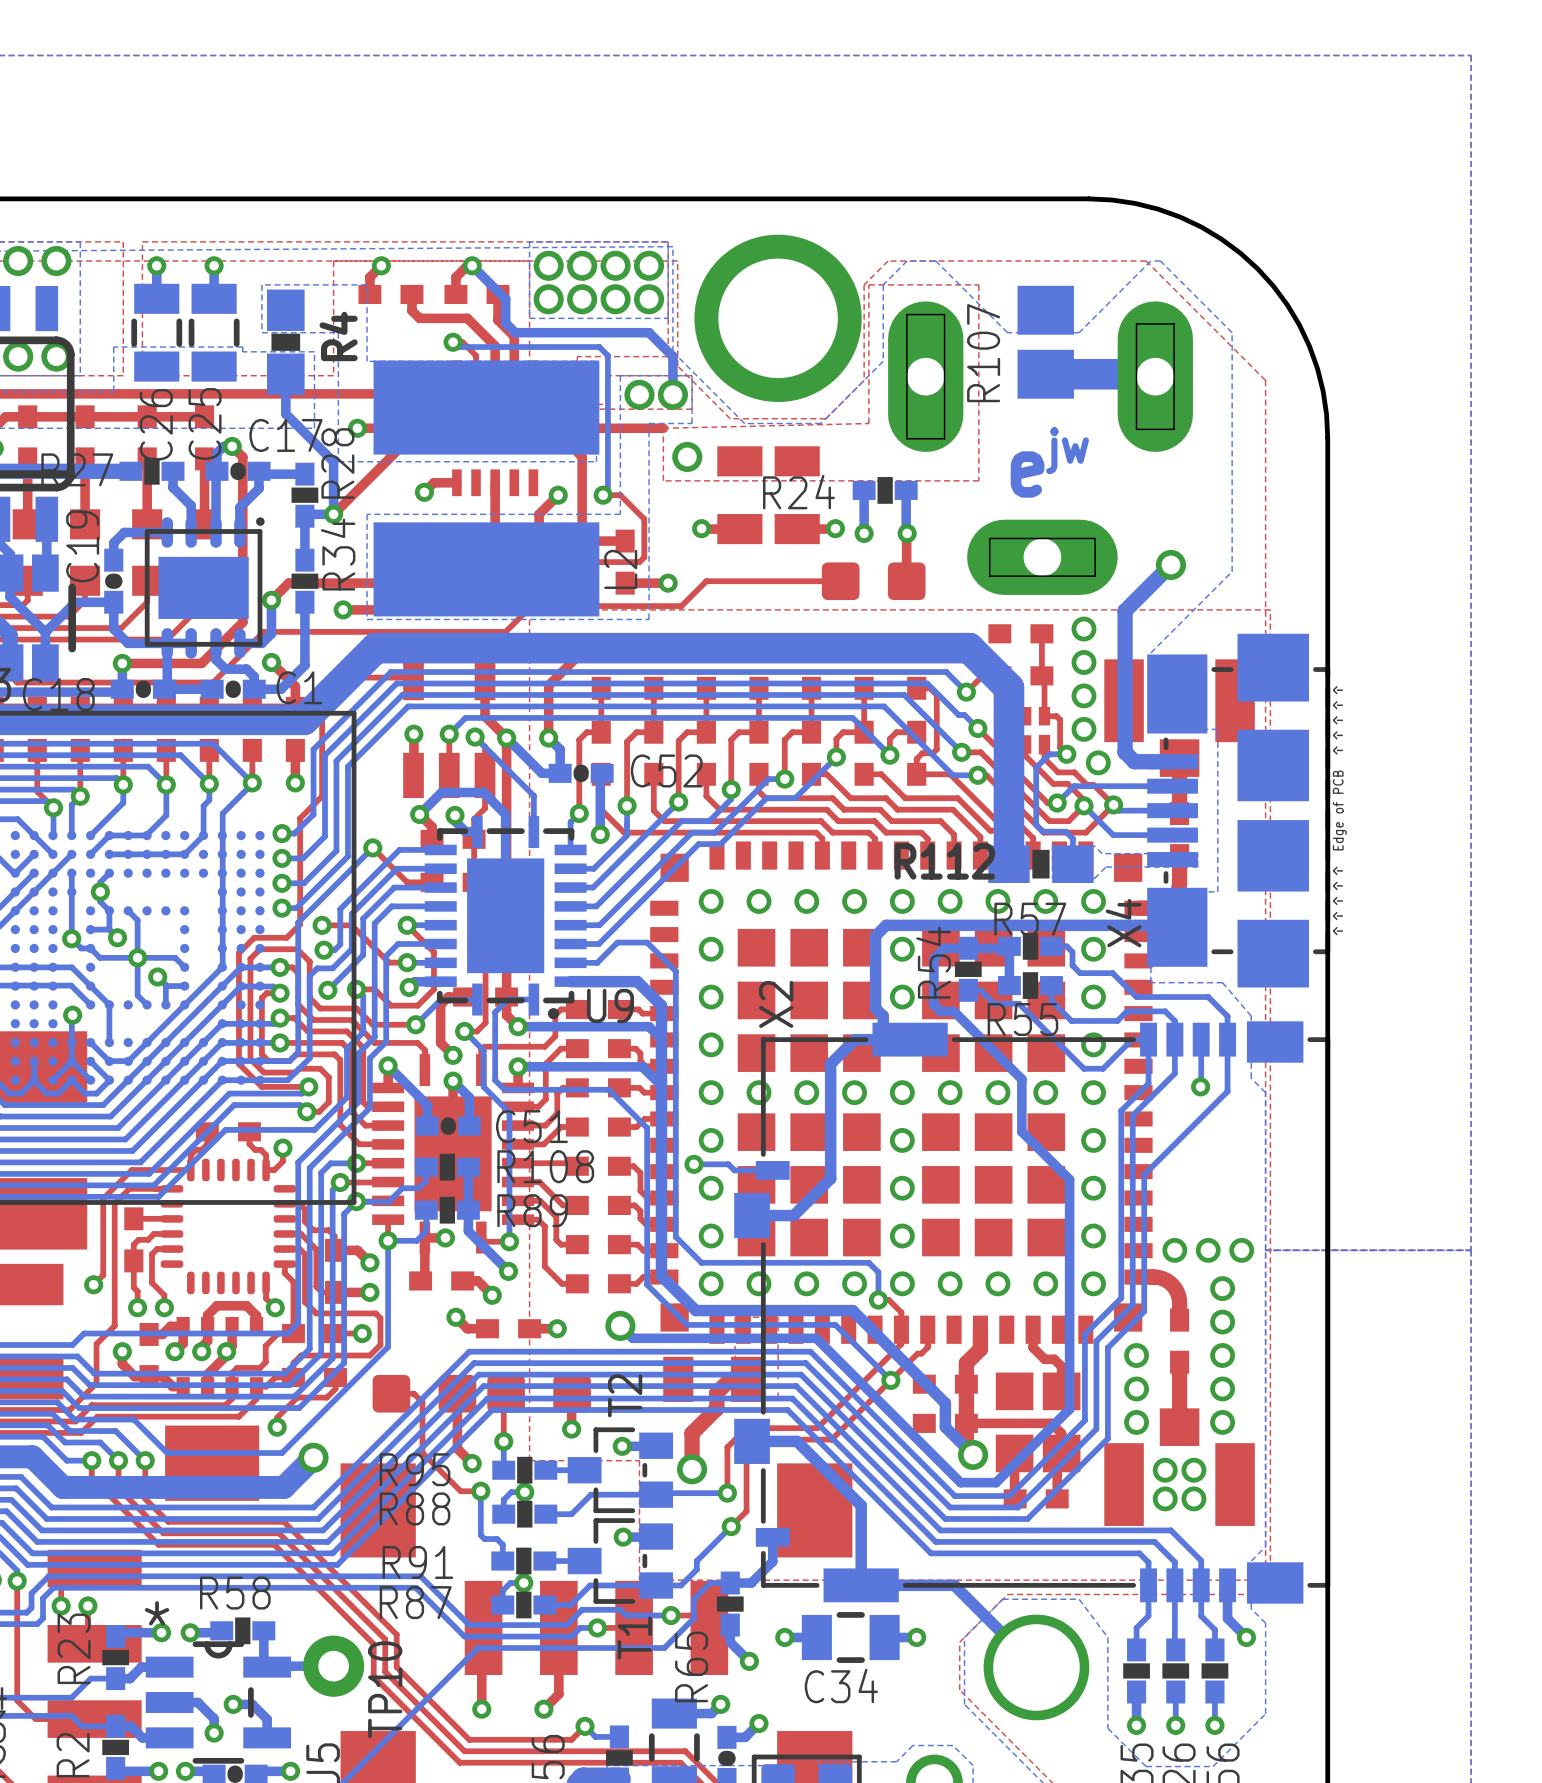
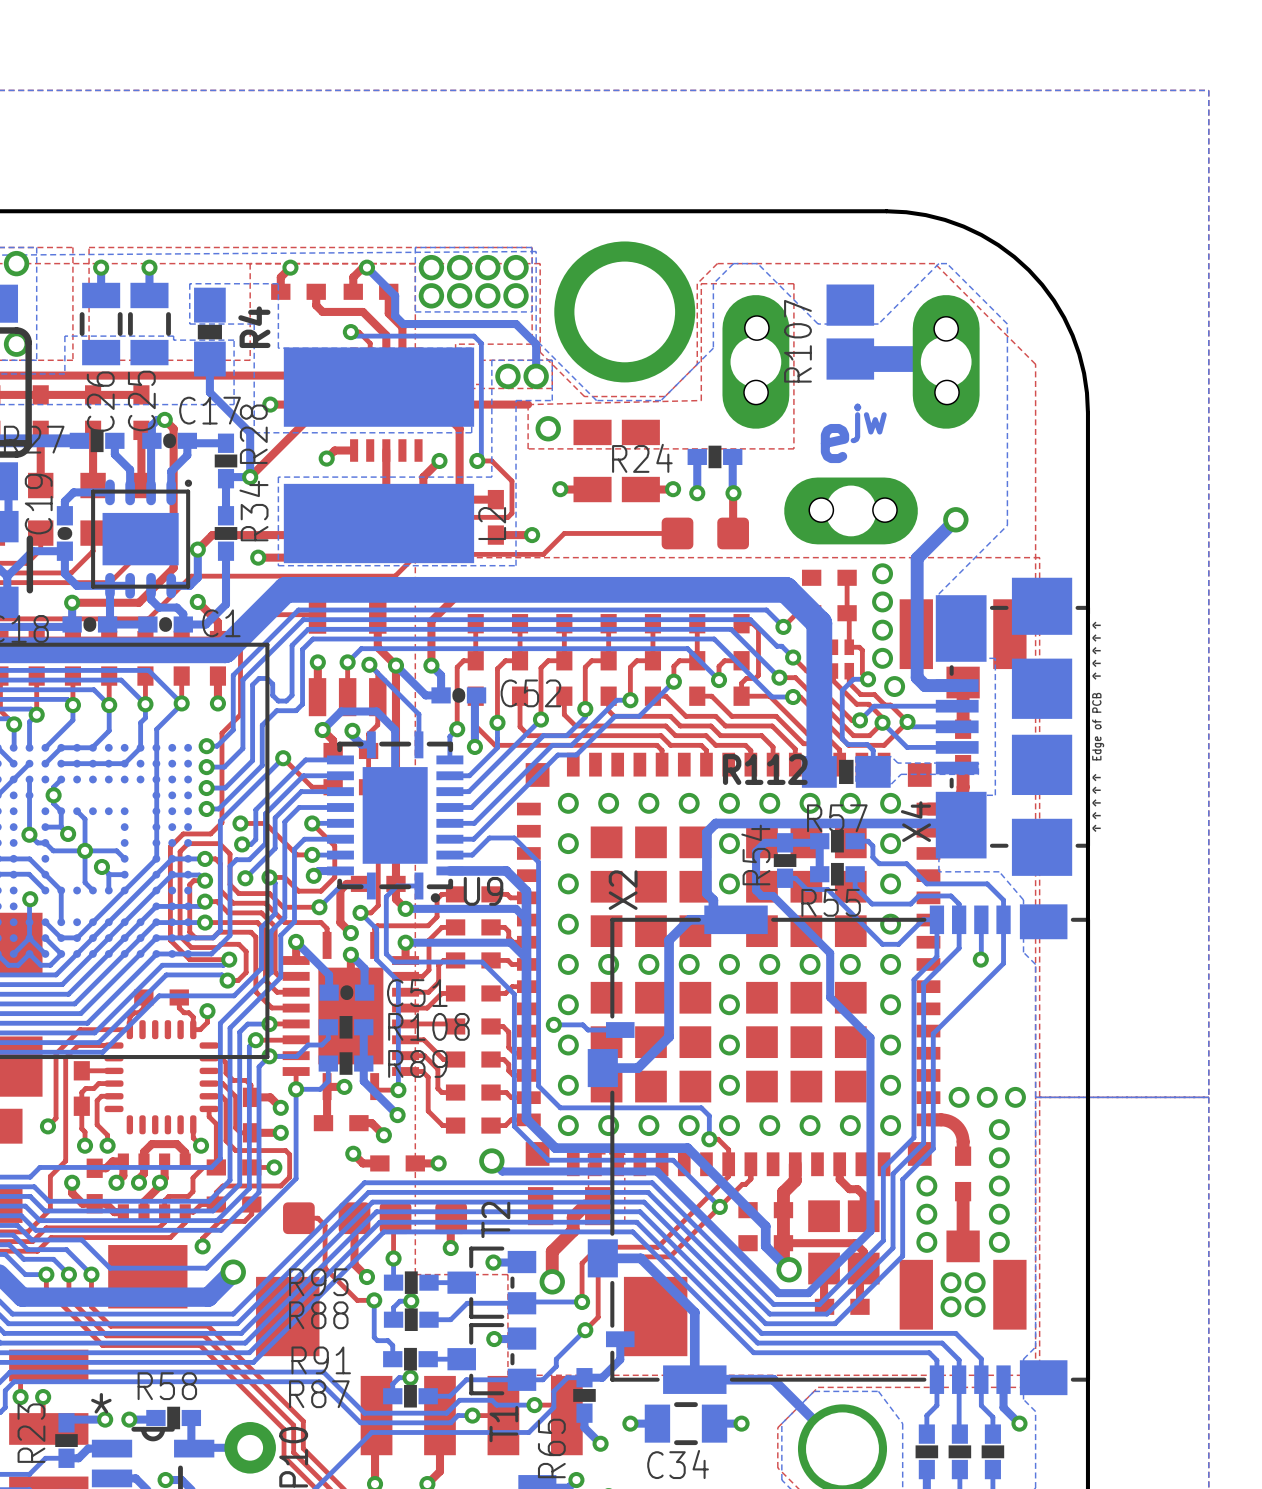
part footprint: [888, 301, 1193, 595] -> [722, 295, 980, 545]
bottom track: (383, 714) (344, 753) -> (292, 645) (292, 695) (286, 701) (278, 701) (272, 695) (272, 684) (267, 678) (259, 678)
bottom track: (395, 718) (347, 766) (347, 808) -> (302, 649) (302, 704) (296, 710) (276, 710) (262, 725)

